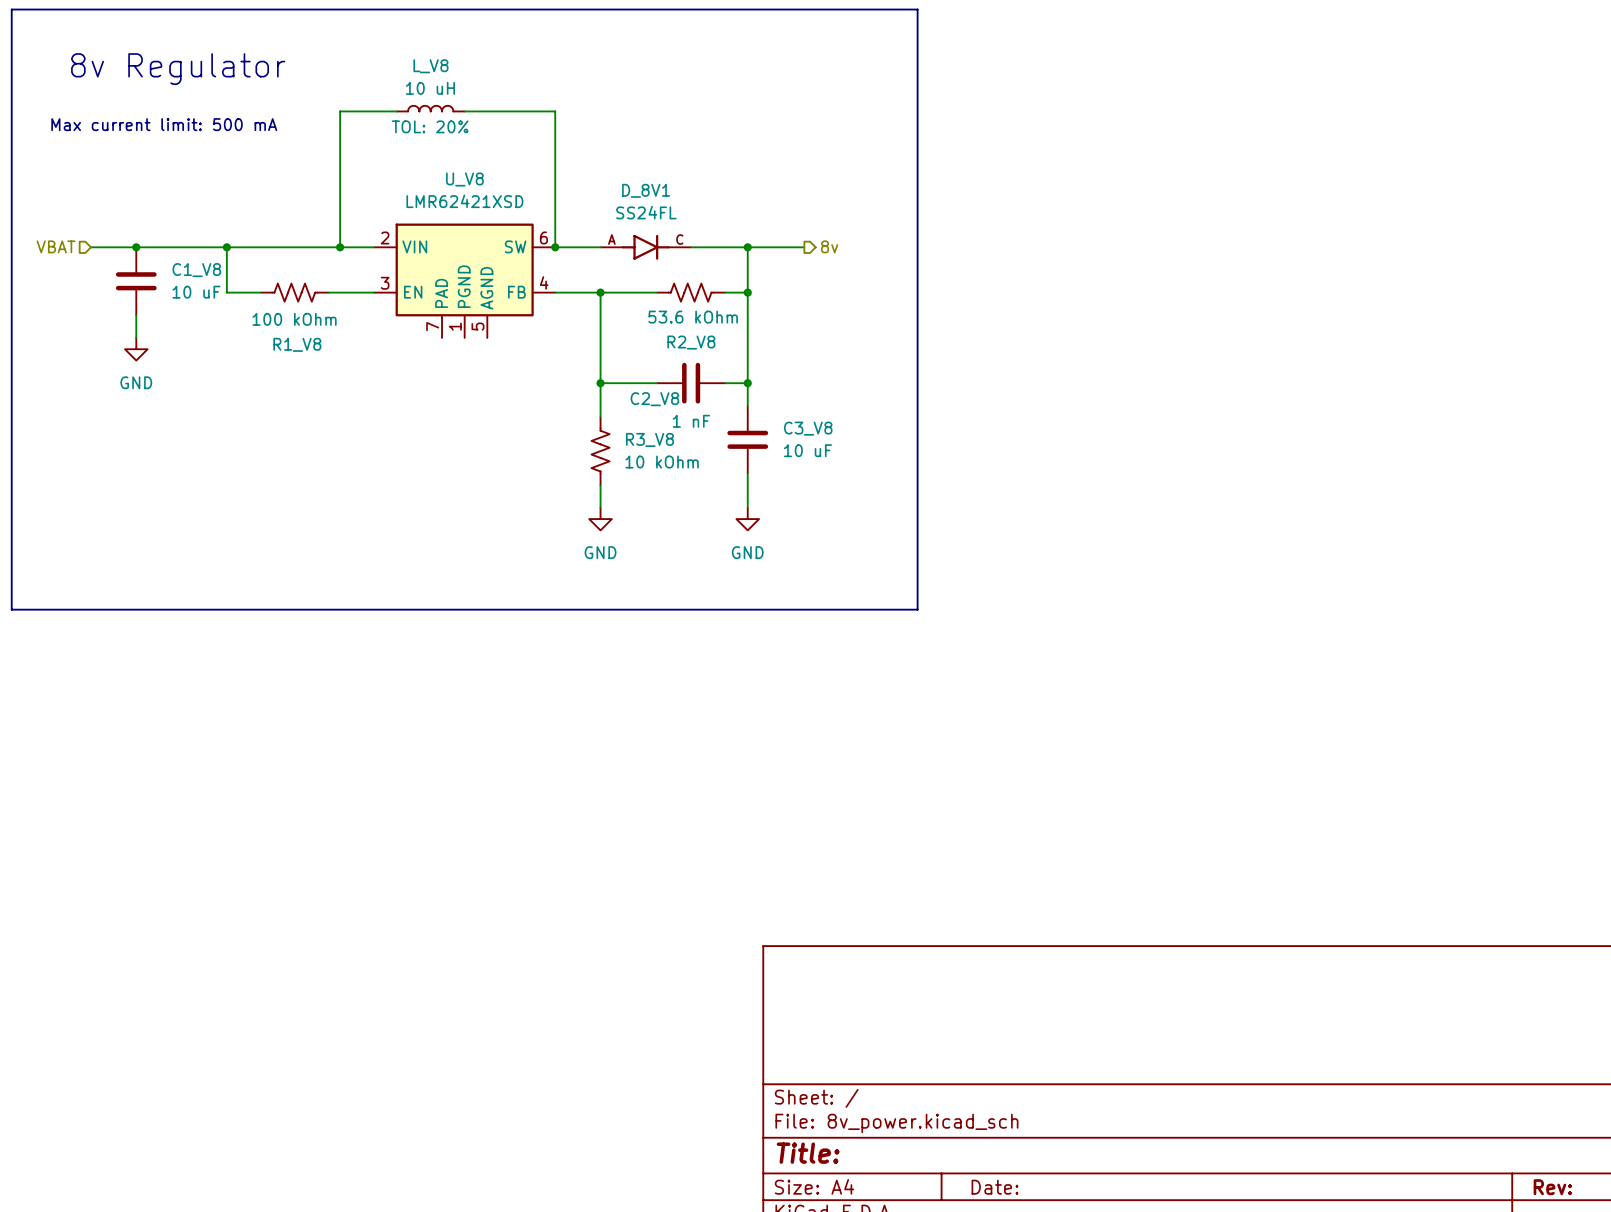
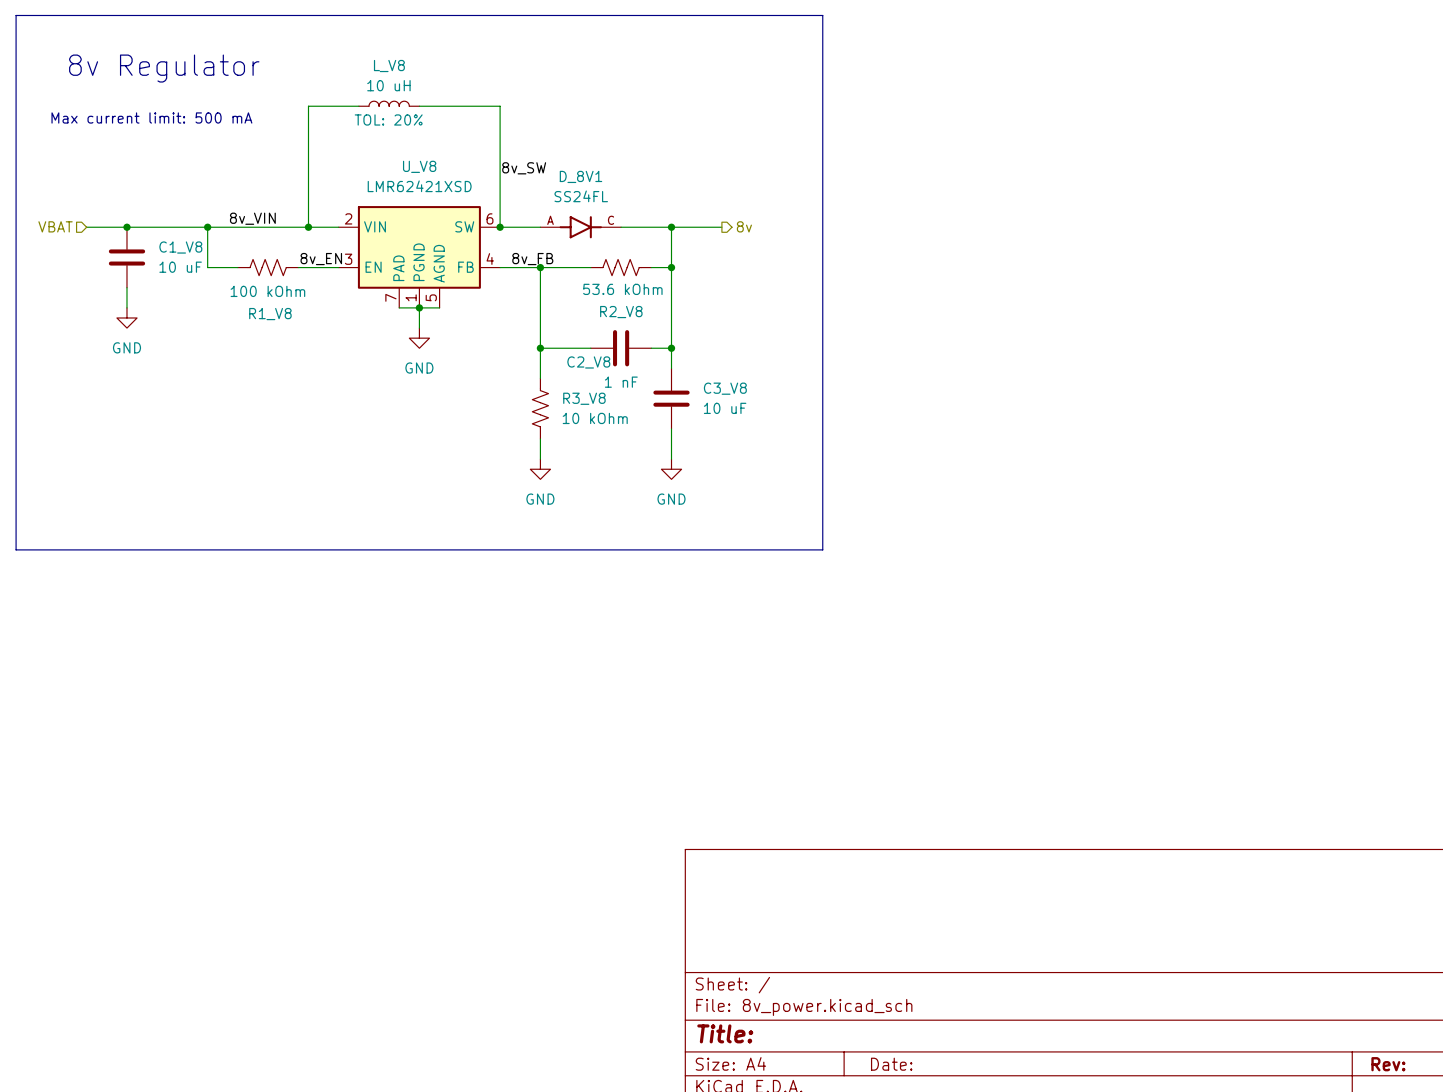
label: none -> 8v_SW (524, 168)
label: none -> 8v_VIN (252, 218)
label: none -> 8v_EN (321, 259)
label: none -> 8v_FB (532, 259)
wire: none -> (399, 307) (439, 307)
wire: none -> (419, 307) (419, 328)
junction: none -> (419, 307)
power symbol: none -> GND (419, 338)

